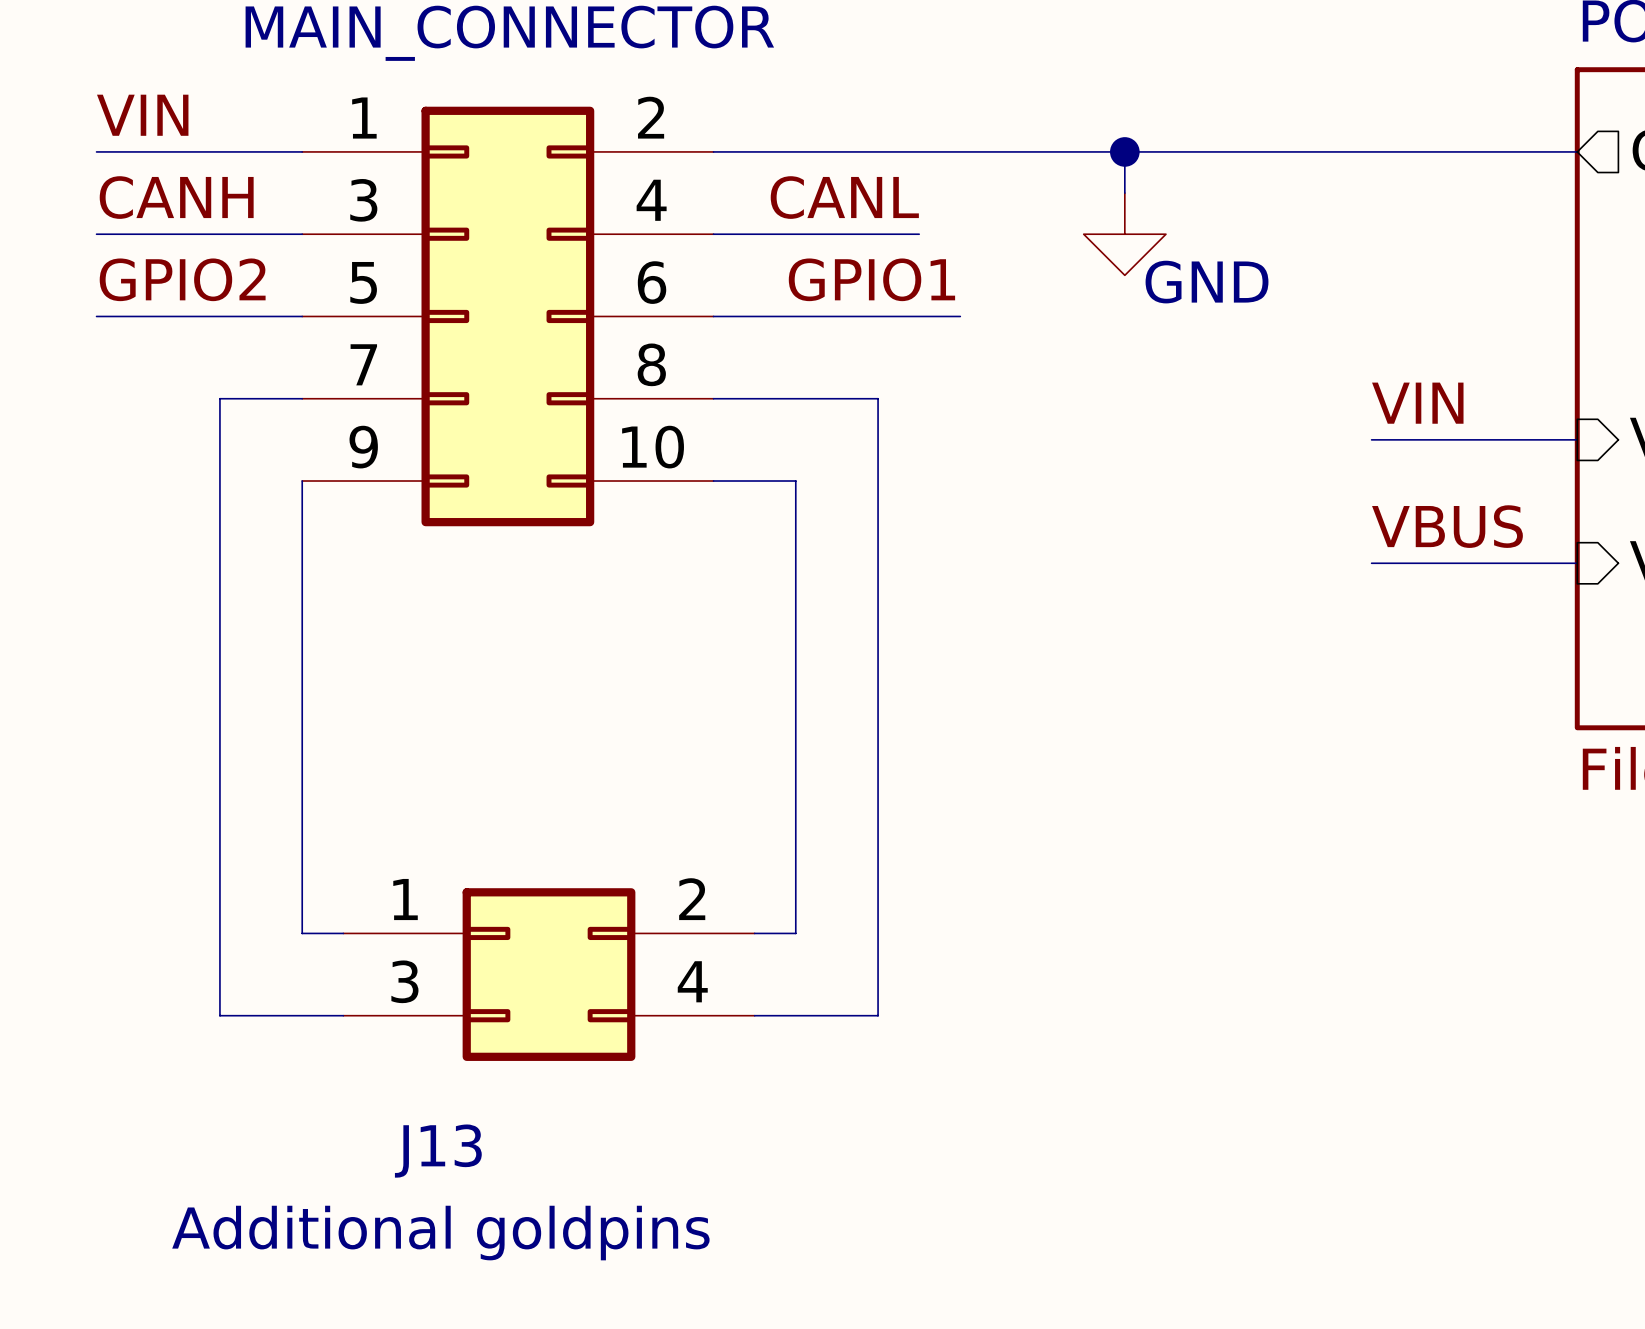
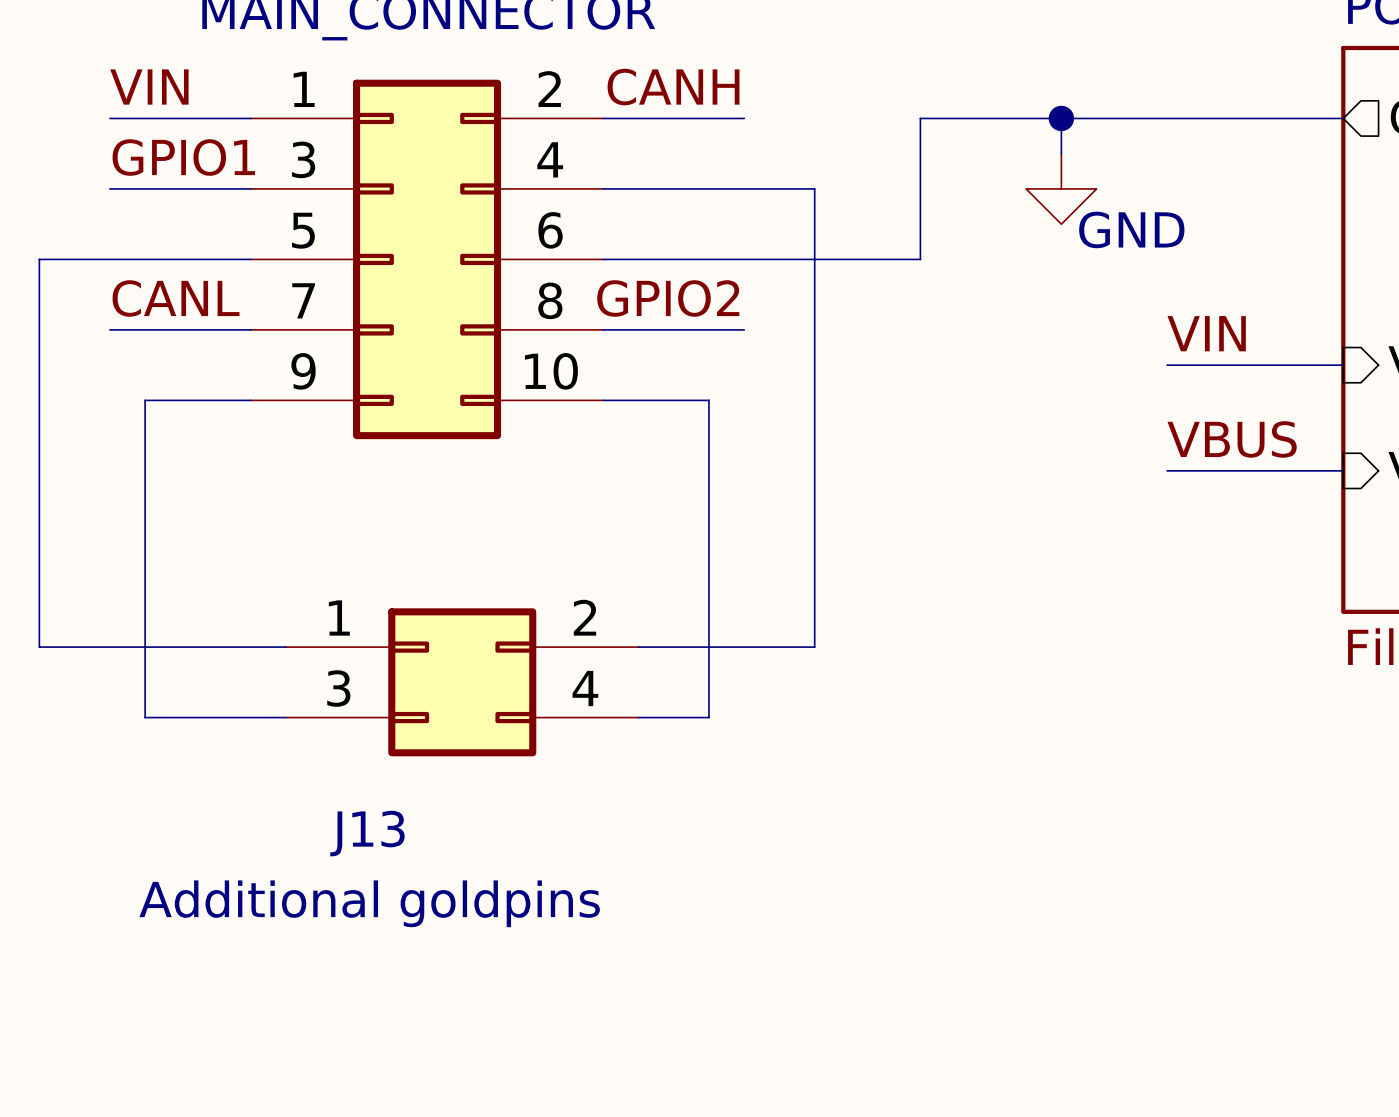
label position: VIN (142, 115) -> VIN (149, 87)
wire: (96, 151) (137, 151) -> none
wire: (878, 151) (1083, 151) -> (814, 259) (920, 259) (920, 118)
wire: (1124, 151) (1124, 193) -> (1061, 118) (1061, 153)
junction position: (1124, 151) -> (1061, 118)
label position: CANH (176, 197) -> CANH (673, 87)
label: none -> GPIO1 (183, 157)
label position: CANL (844, 197) -> CANL (176, 298)
wire: (96, 234) (137, 234) -> none
wire: none -> (779, 188) (814, 188) (814, 647) (638, 647)
power symbol position: GND (1124, 234) -> GND (1061, 188)
label position: GPIO2 (182, 279) -> GPIO2 (668, 298)
label: GPIO1 (871, 279) -> none
wire: none -> (74, 259) (39, 259) (39, 647) (286, 647)
wire: (219, 398) (219, 1015) (343, 1015) -> (180, 329) (109, 329)
wire: (878, 398) (878, 1015) (754, 1015) -> none
wire: (302, 481) (302, 933) (343, 933) -> (250, 400) (145, 400) (145, 717) (286, 717)
wire: (795, 481) (795, 933) (754, 933) -> (673, 400) (708, 400) (708, 717) (638, 717)
J13 position: (549, 974) -> (462, 682)

